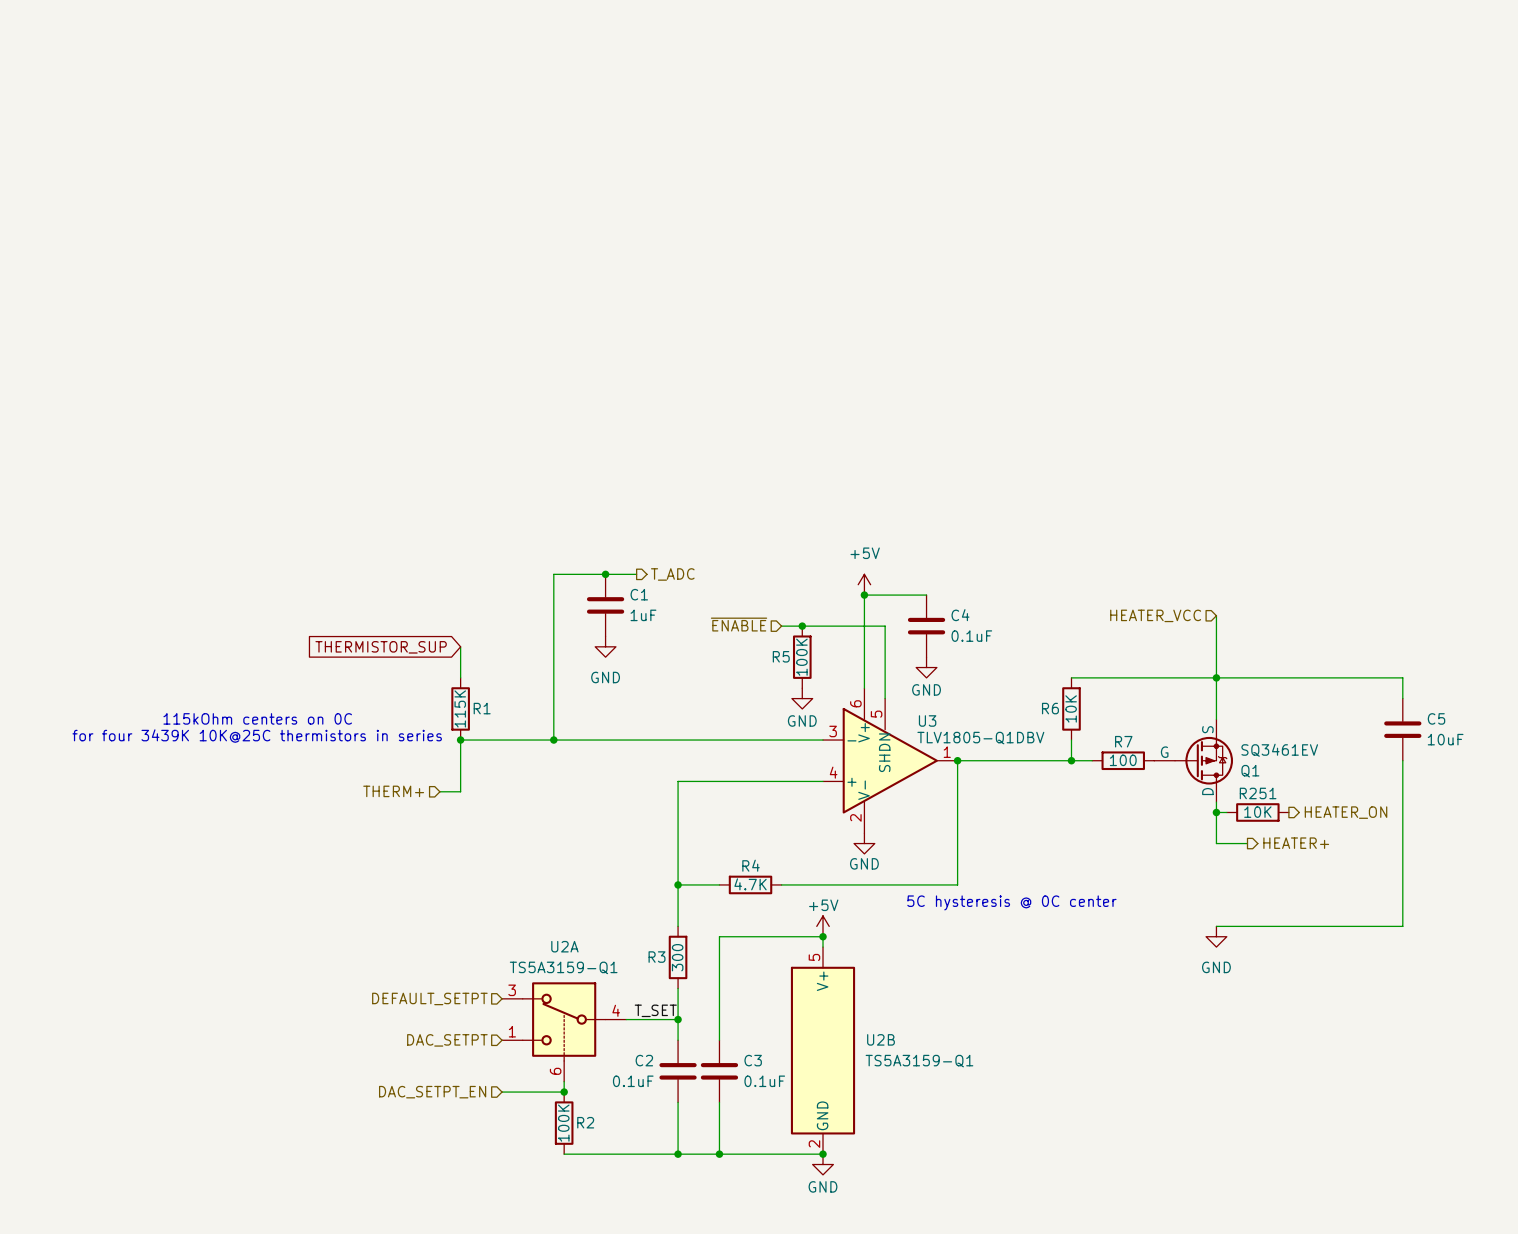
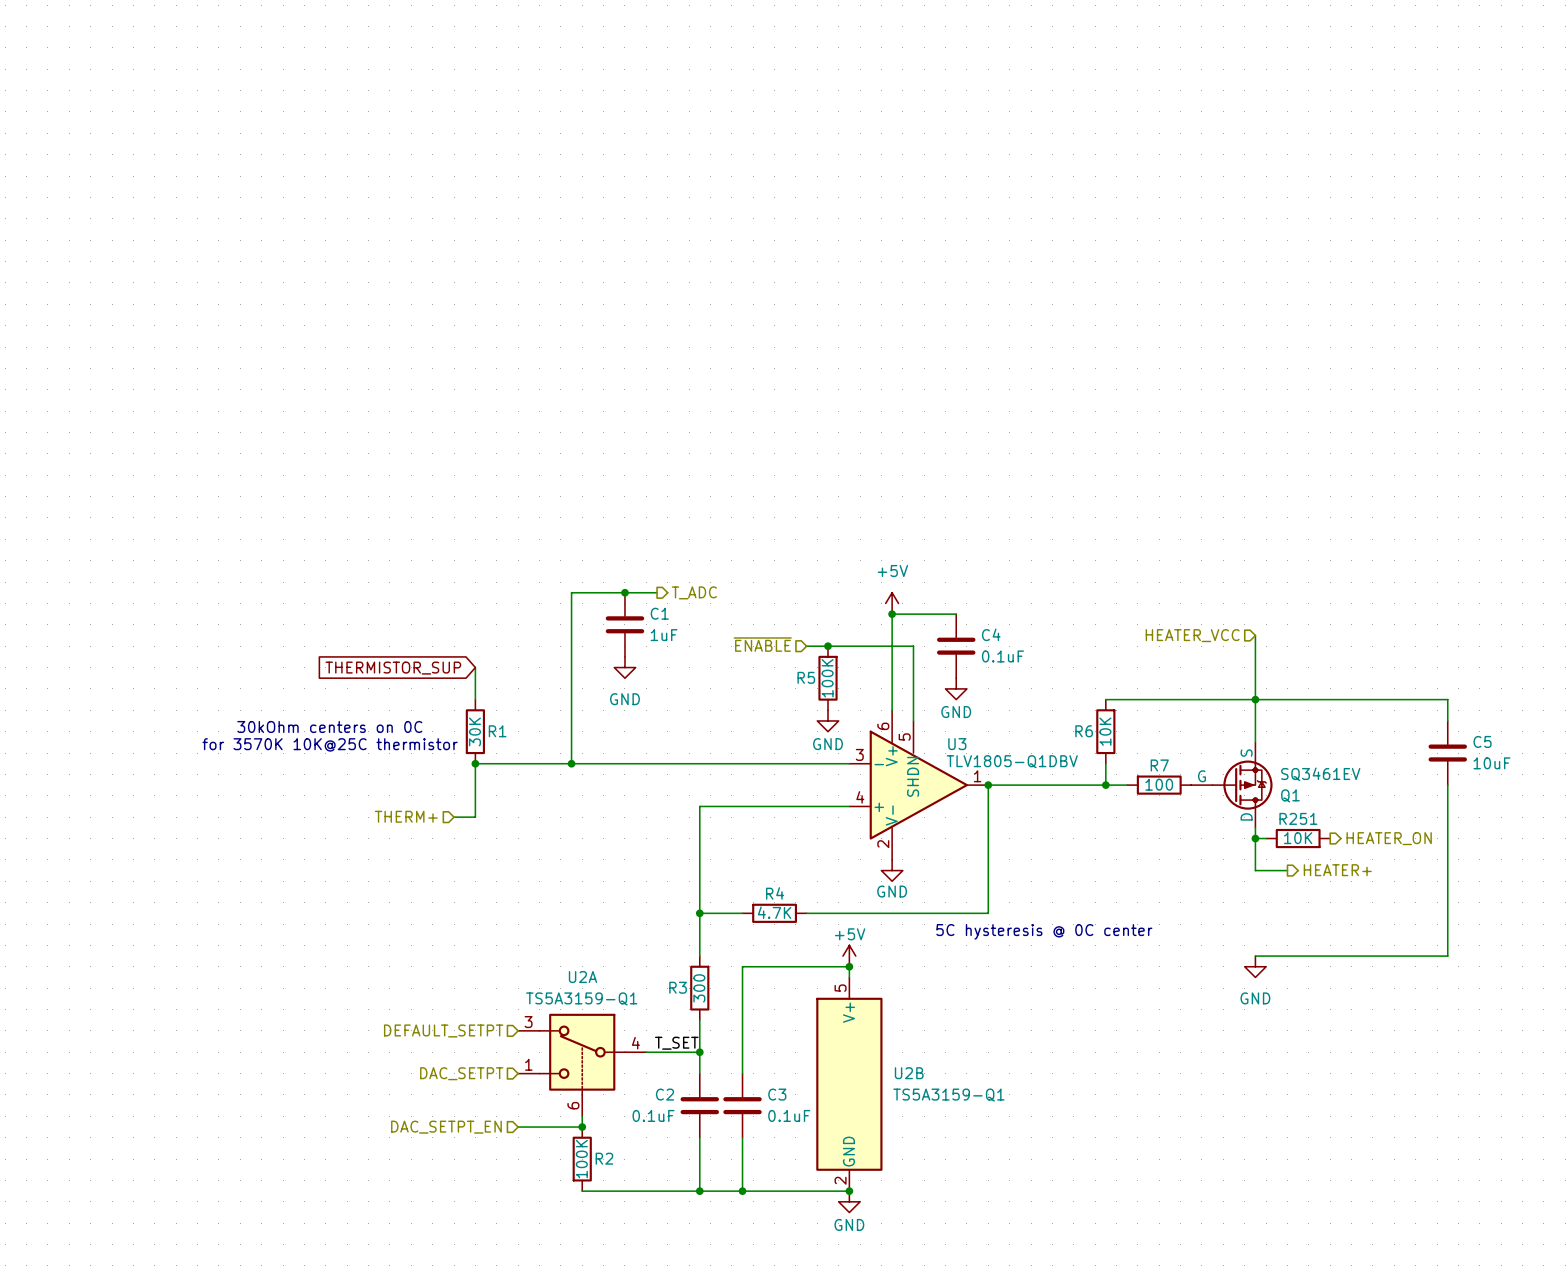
R1 value: 115K (460, 708) -> 30K (474, 731)
text: 115kOhm centers on 0C (257, 718) -> 30kOhm centers on 0C (329, 726)
text: for four 3439K 10K@25C thermistors in series (257, 736) -> for 3570K 10K@25C thermistor (330, 744)

